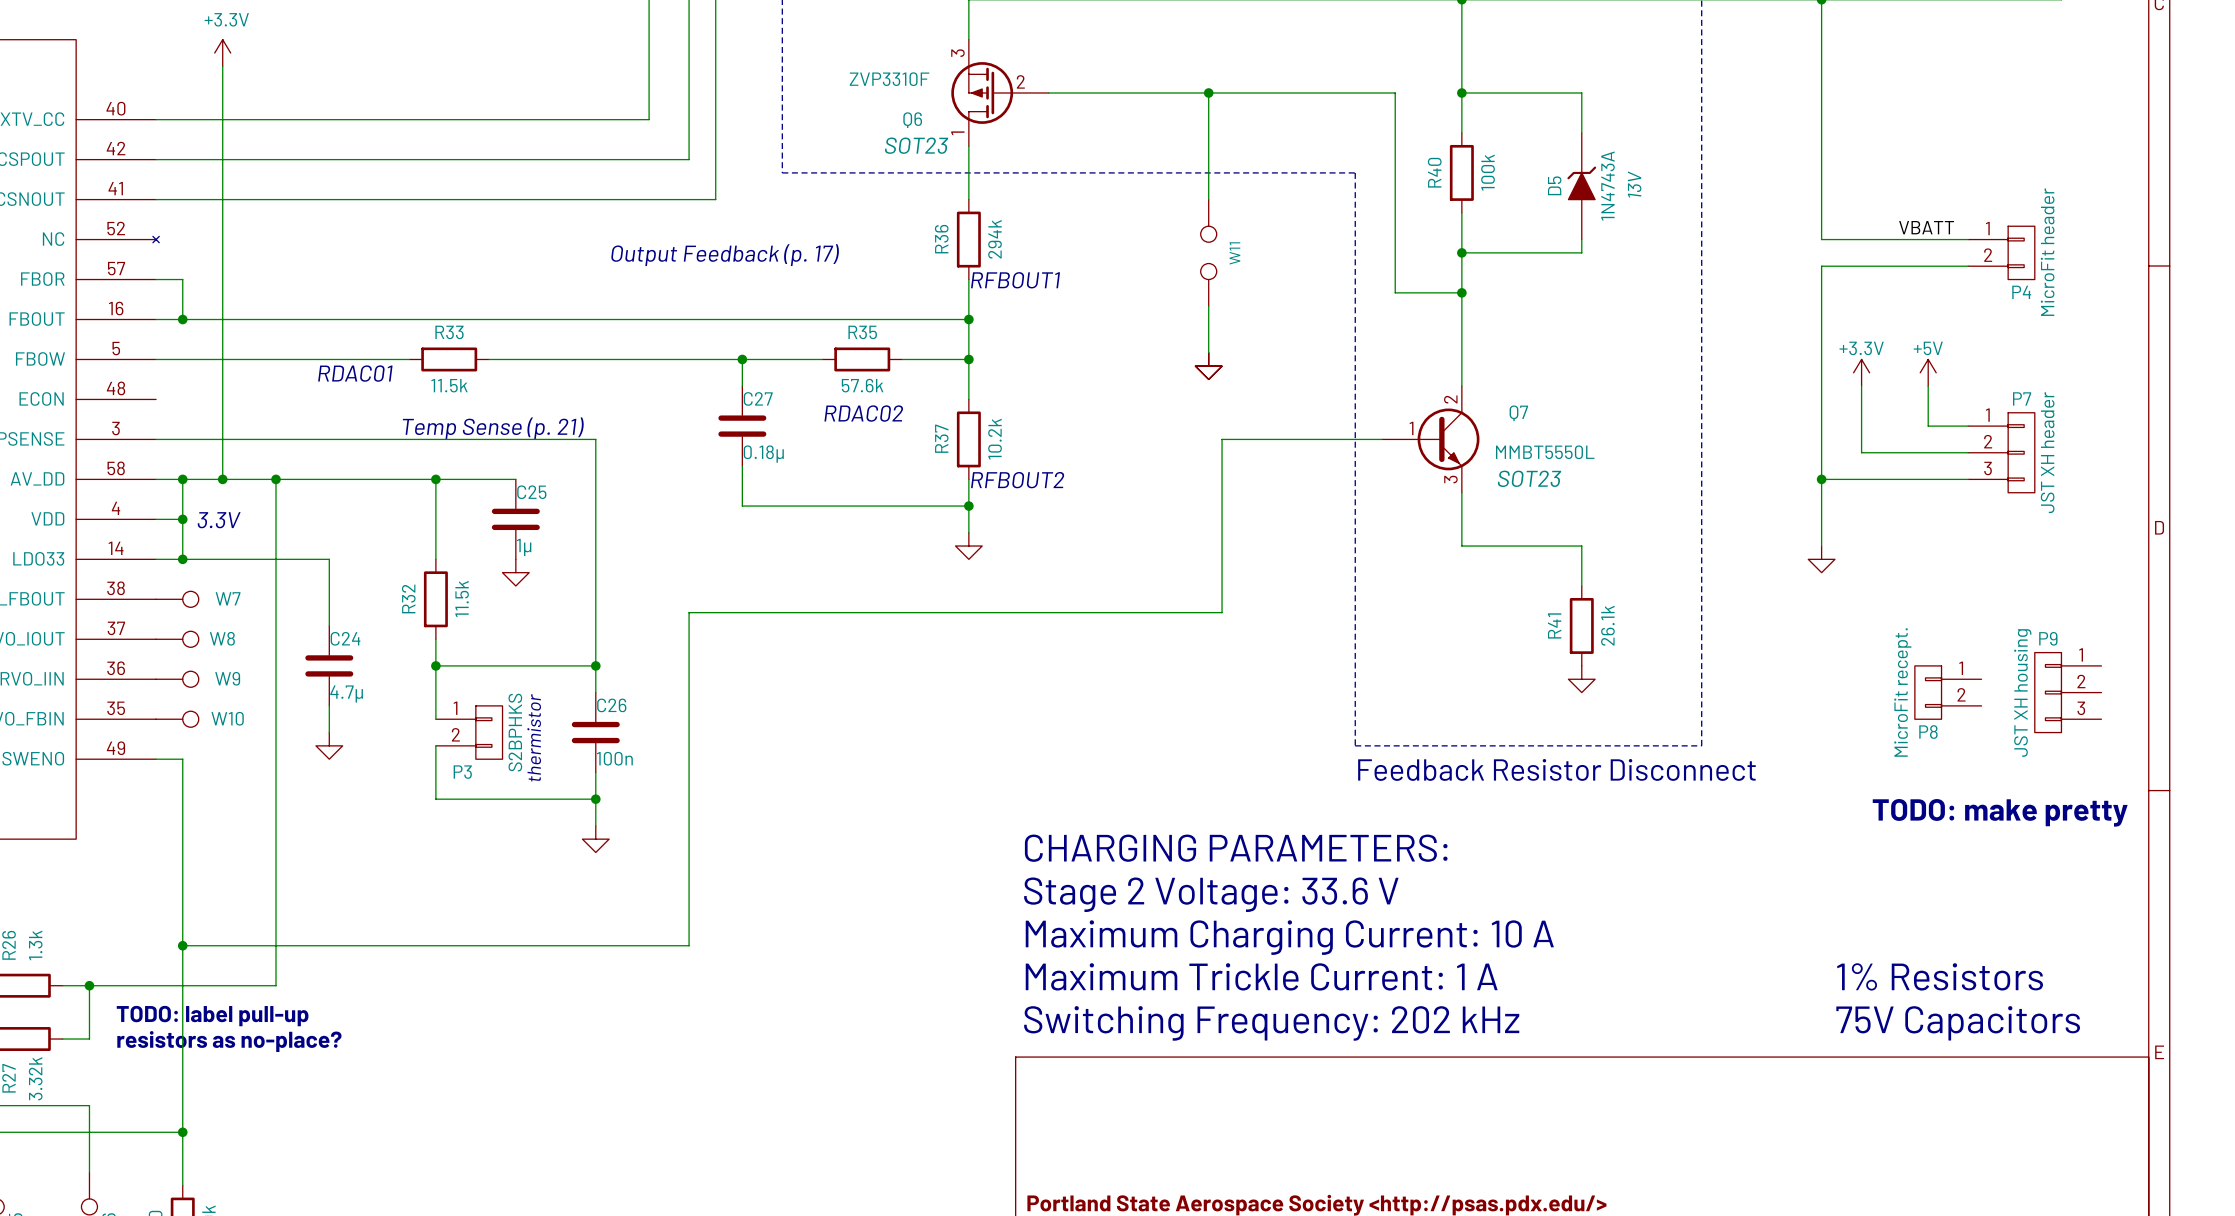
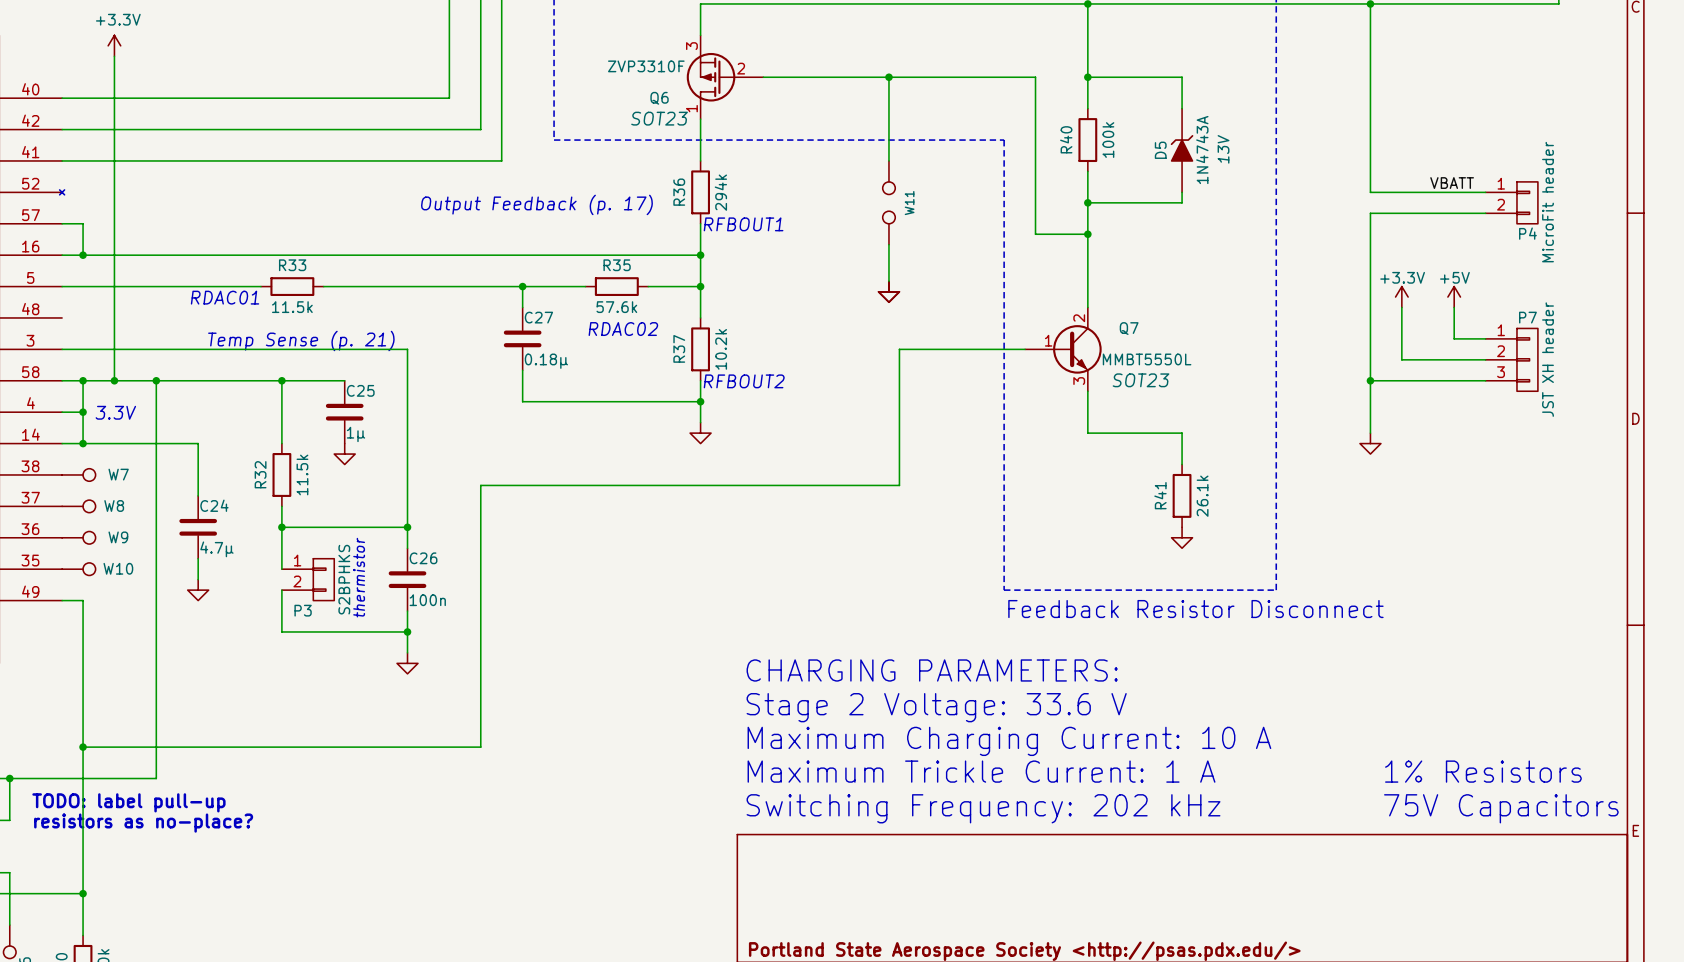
P8: MicroFit recept. (1948, 692) -> none
P9: JST XH housing (2068, 692) -> none
text: TODO: make pretty (2000, 812) -> none

